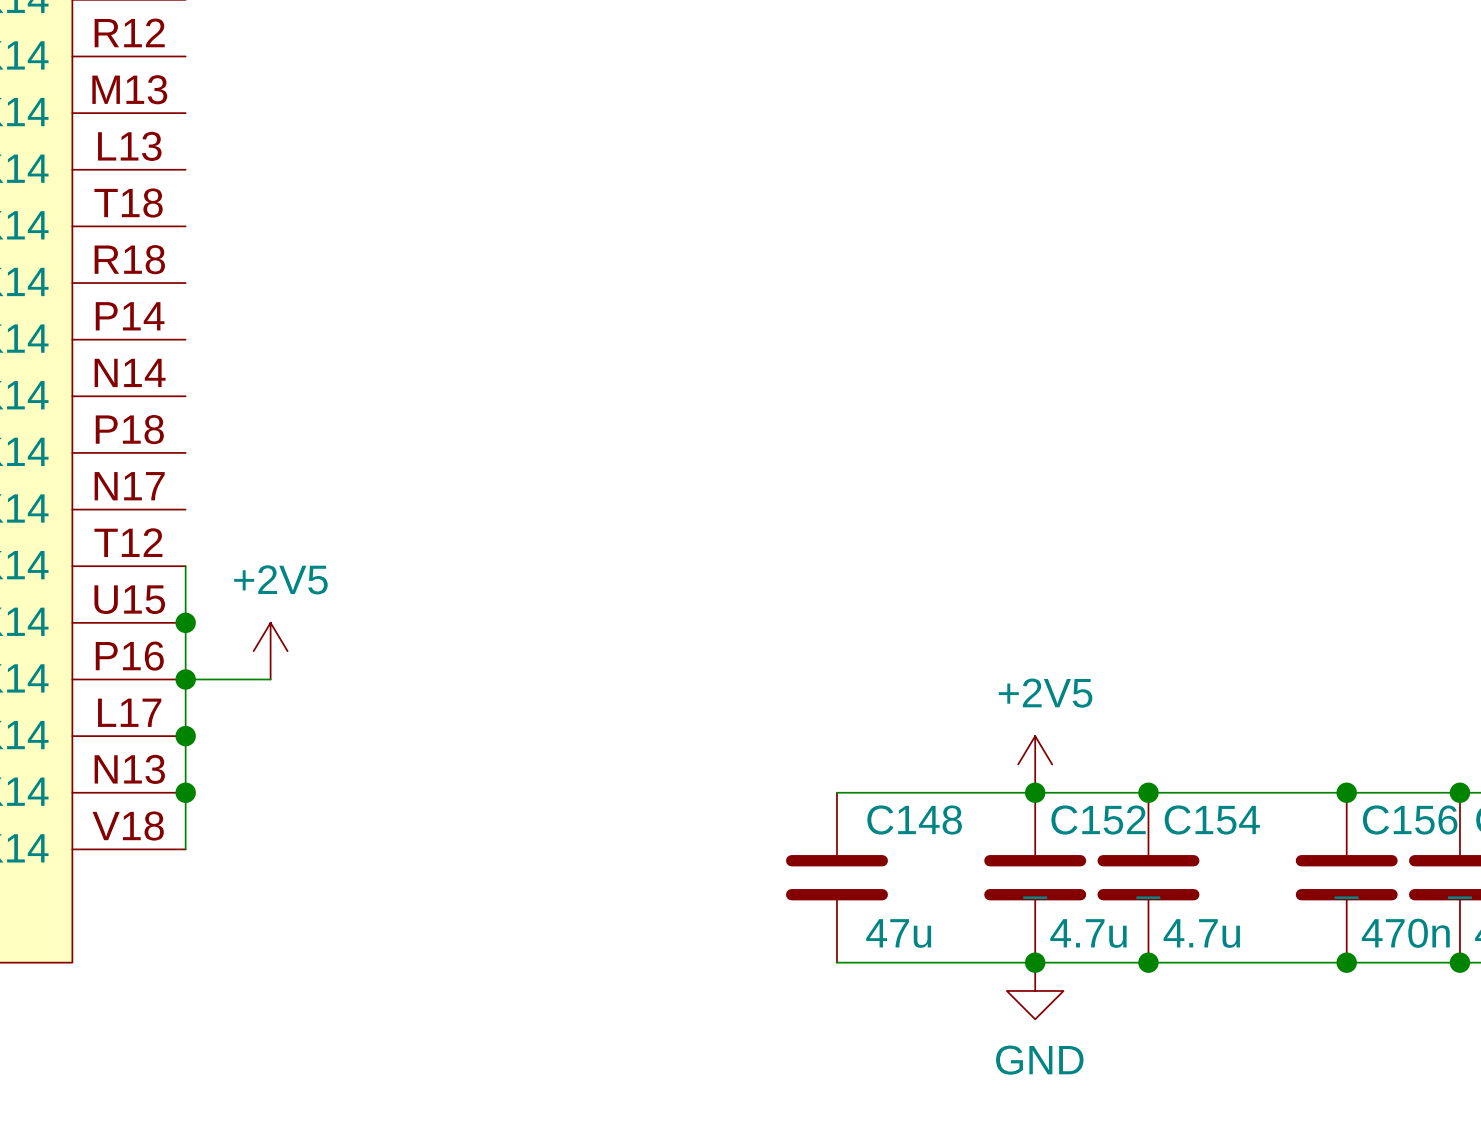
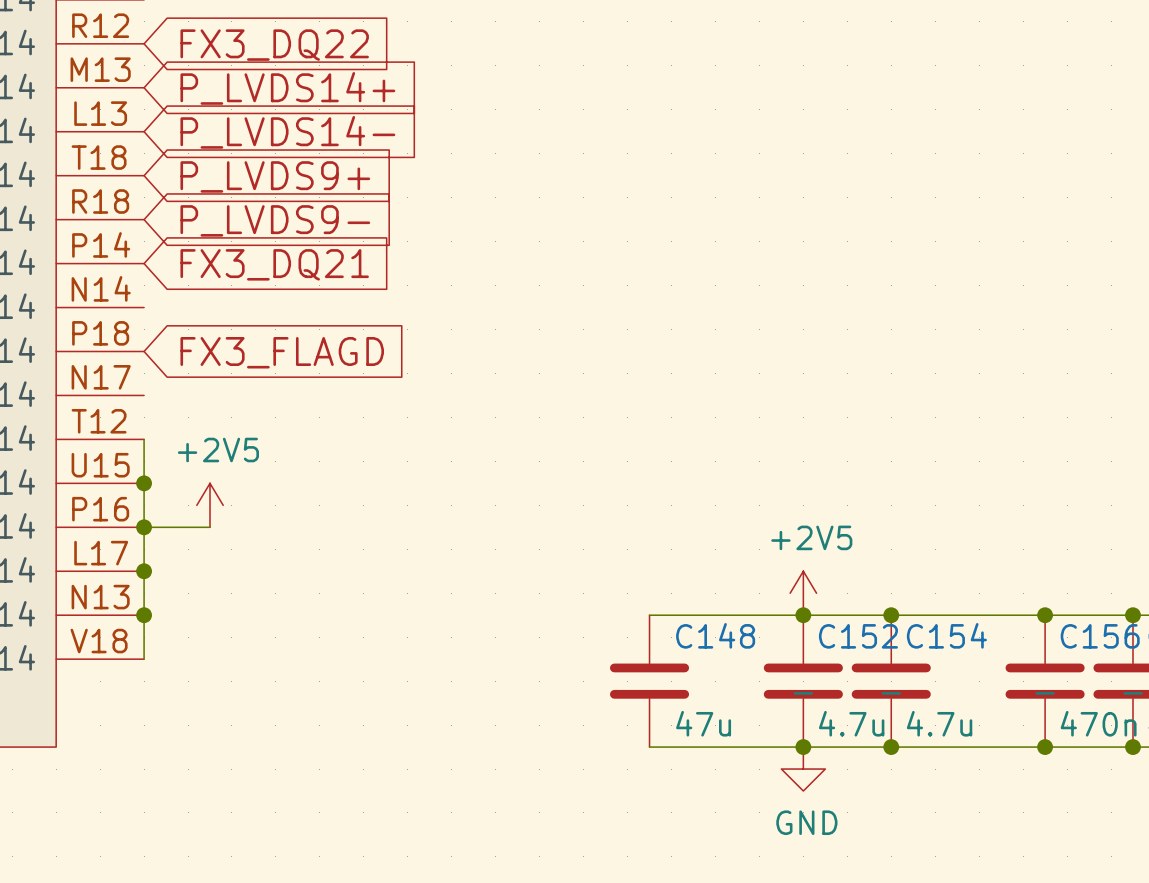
global label: none -> FX3_DQ22 (274, 45)
global label: none -> P_LVDS14+ (287, 88)
global label: none -> P_LVDS14- (287, 132)
global label: none -> P_LVDS9+ (275, 176)
global label: none -> P_LVDS9- (275, 220)
global label: none -> FX3_DQ21 (274, 264)
global label: none -> FX3_FLAGD (282, 352)

